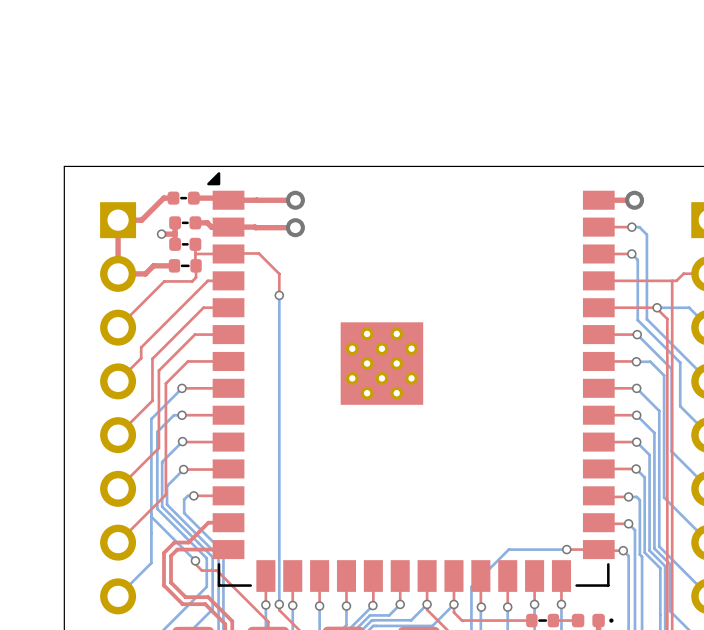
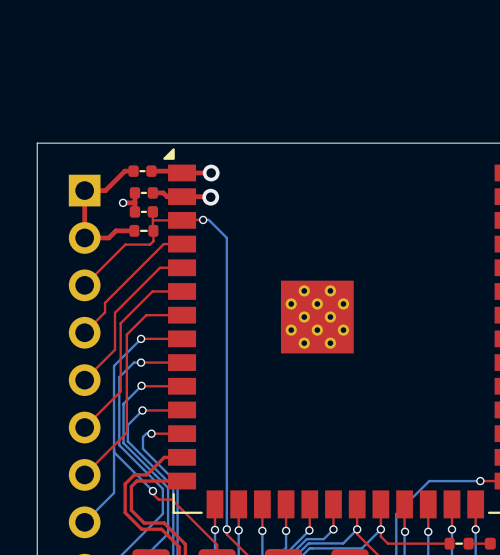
top track: (261, 200) (295, 200) -> none
via: none -> (211, 173)
via: (295, 200) -> none
top track: (261, 227) (295, 227) -> none
via: none -> (210, 197)
via: (295, 227) -> none
top track: (252, 253) (258, 253) (279, 273) (279, 295) -> none
bottom track: none -> (204, 219) (208, 219) (226, 237) (226, 256)
via position: (279, 295) -> (203, 219)

